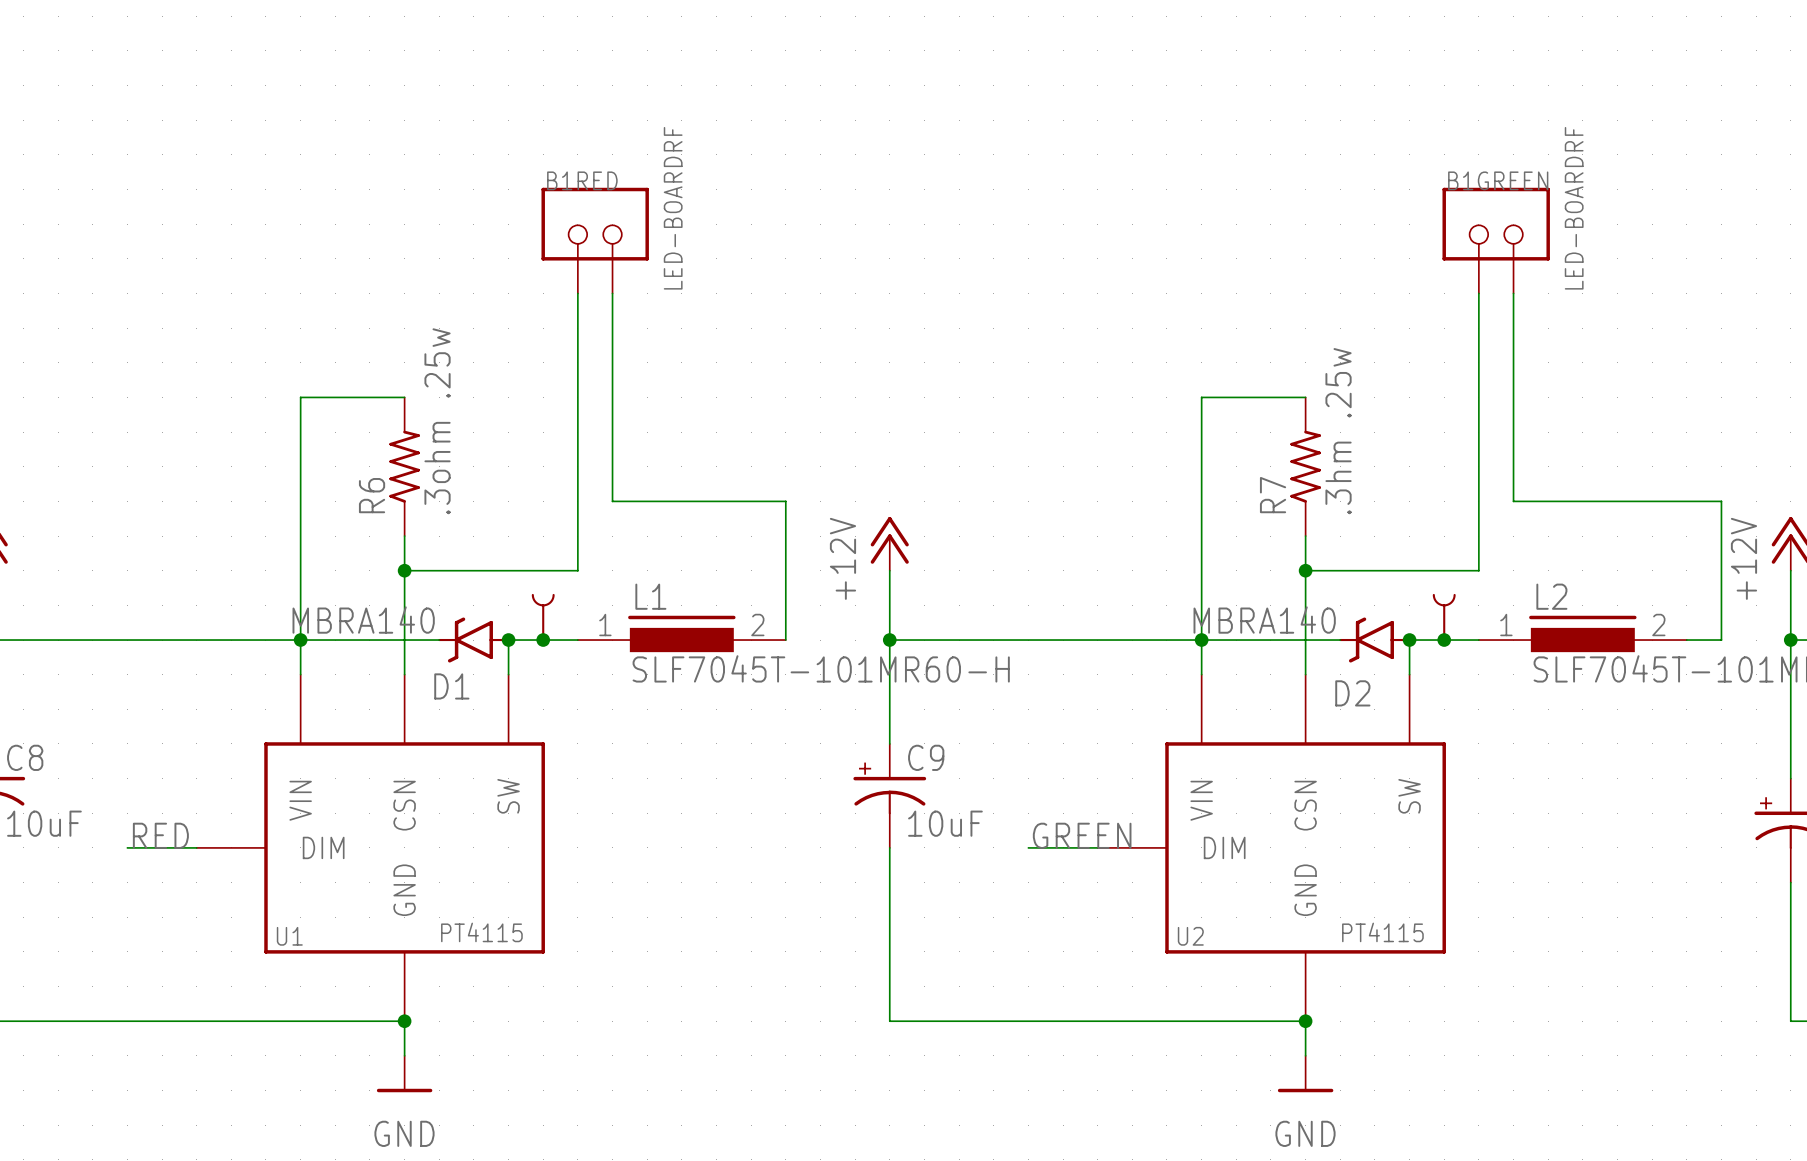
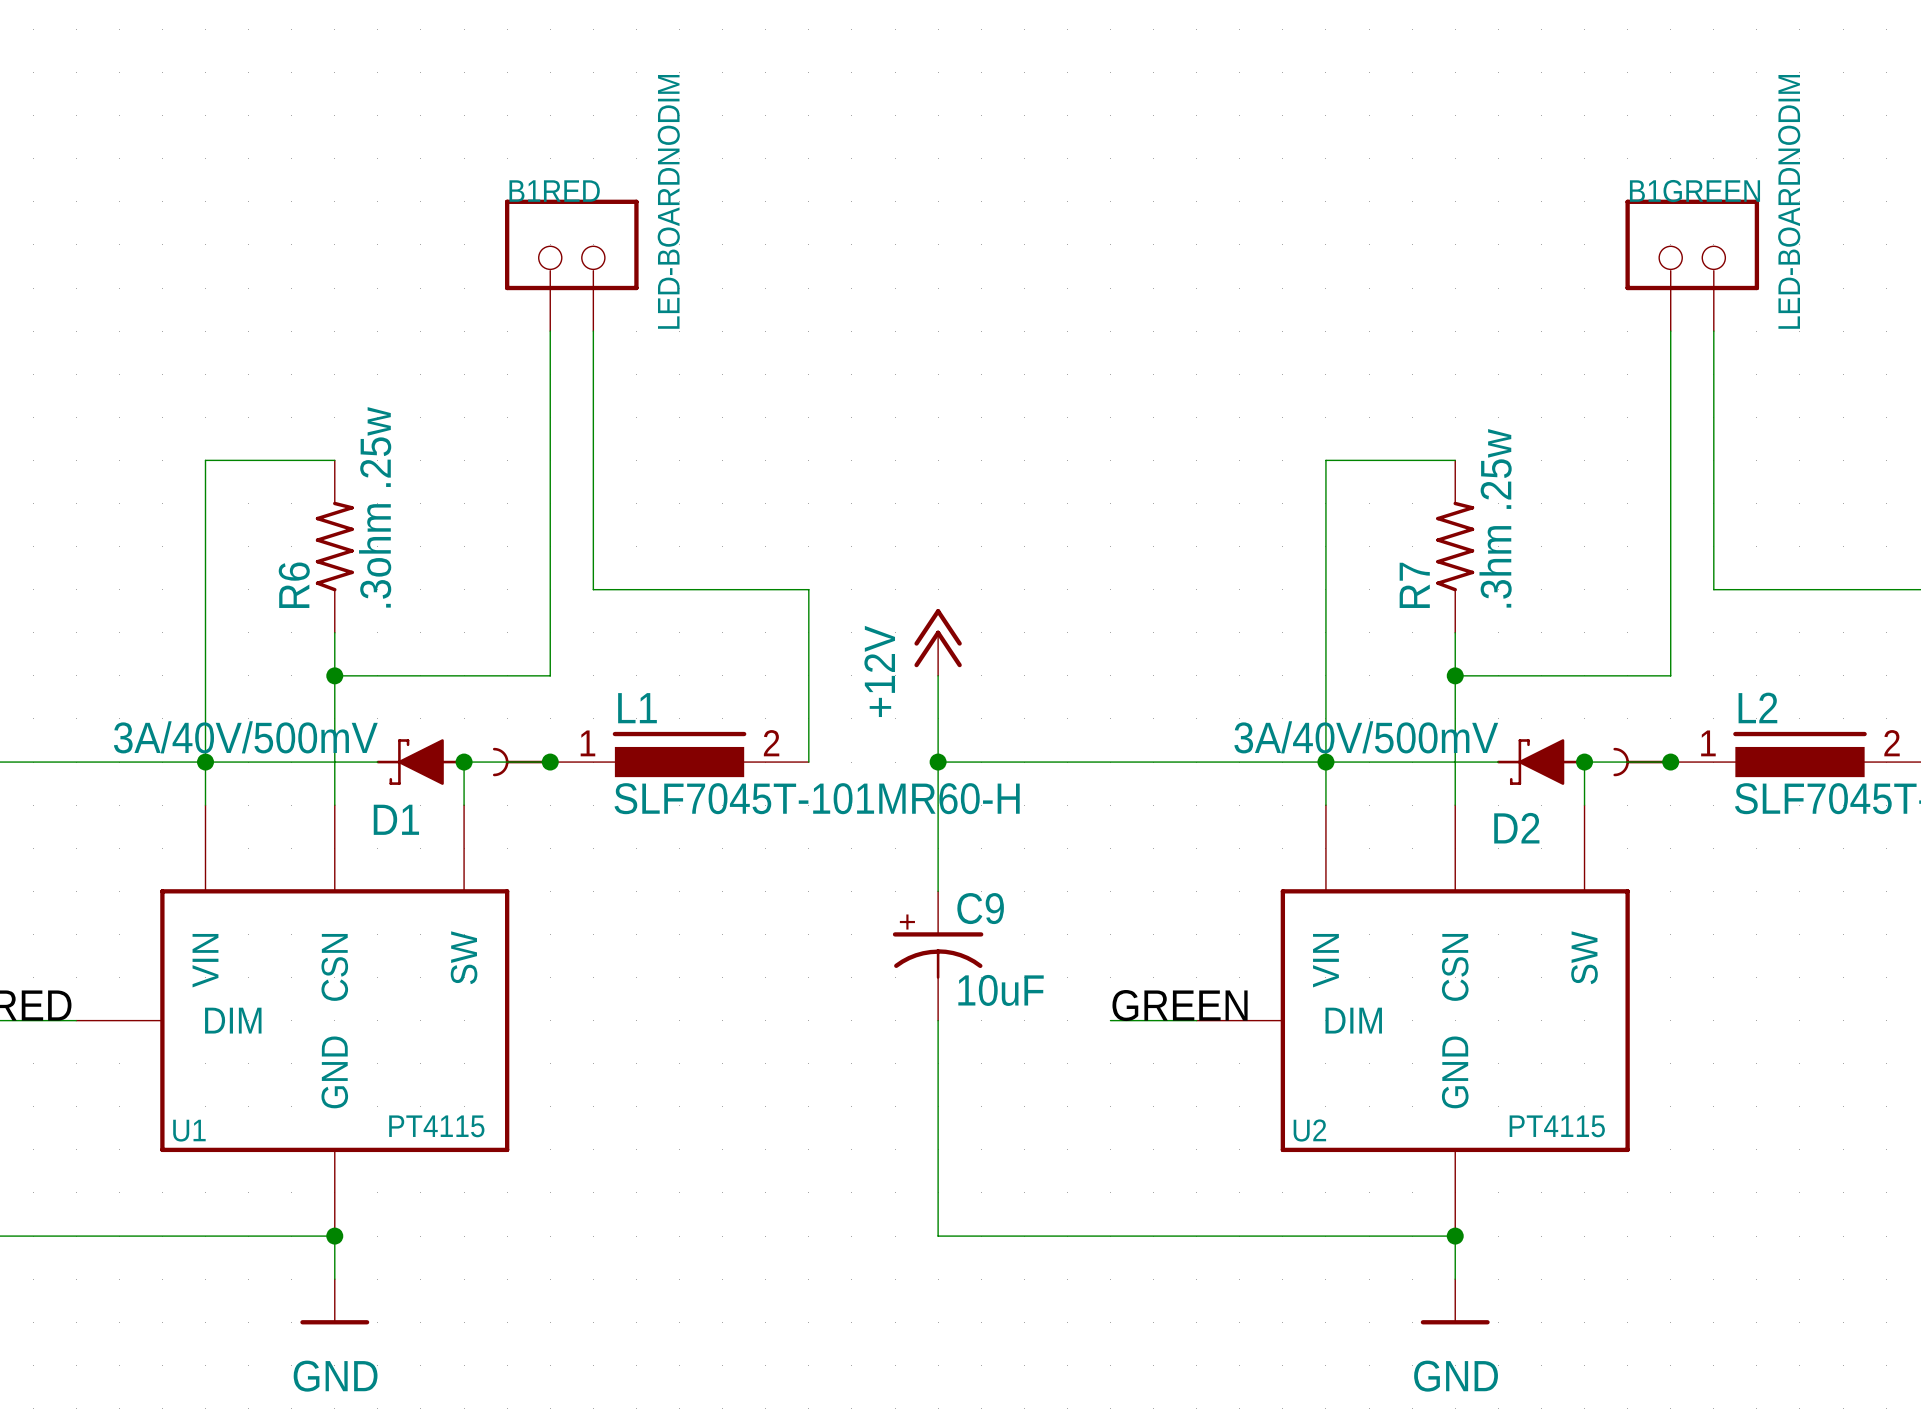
B1RED value: LED-BOARDRF (673, 208) -> LED-BOARDNODIM (668, 201)
B1GREEN value: LED-BOARDRF (1574, 208) -> LED-BOARDNODIM (1789, 201)
D1 symbol: [438, 617, 510, 663] -> [376, 739, 466, 785]
part rotation: 0° (543, 617) -> 90° counterclockwise (522, 762)
D2 symbol: [1339, 617, 1411, 663] -> [1497, 739, 1586, 785]
part rotation: 0° (1444, 617) -> 90° counterclockwise (1642, 762)
D1 value: MBRA140 (363, 620) -> 3A/40V/500mV (245, 737)
D2 value: MBRA140 (1264, 620) -> 3A/40V/500mV (1366, 737)
junction position: (543, 640) -> (550, 762)
junction position: (1444, 640) -> (1670, 762)

